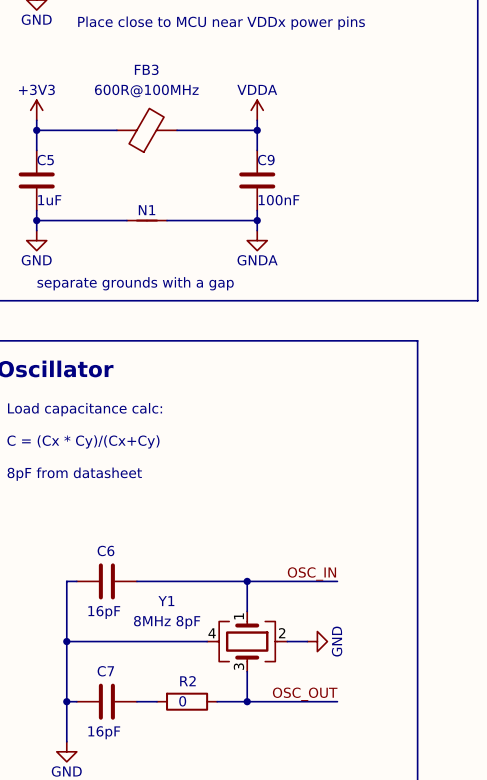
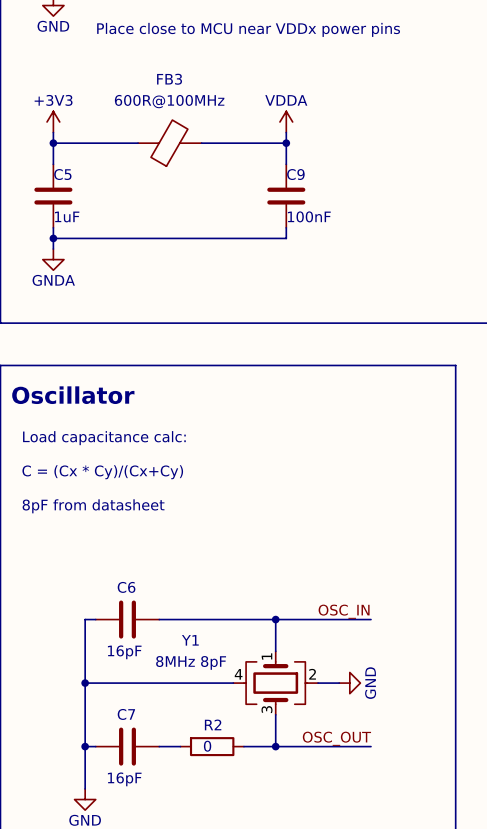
N1: (146, 220) -> none
wire: (257, 220) (257, 230) -> none
junction: (257, 220) -> none
power symbol: GND (36, 240) -> GNDA (53, 259)
power symbol: GNDA (257, 240) -> none
text: separate grounds with a gap (135, 283) -> none

